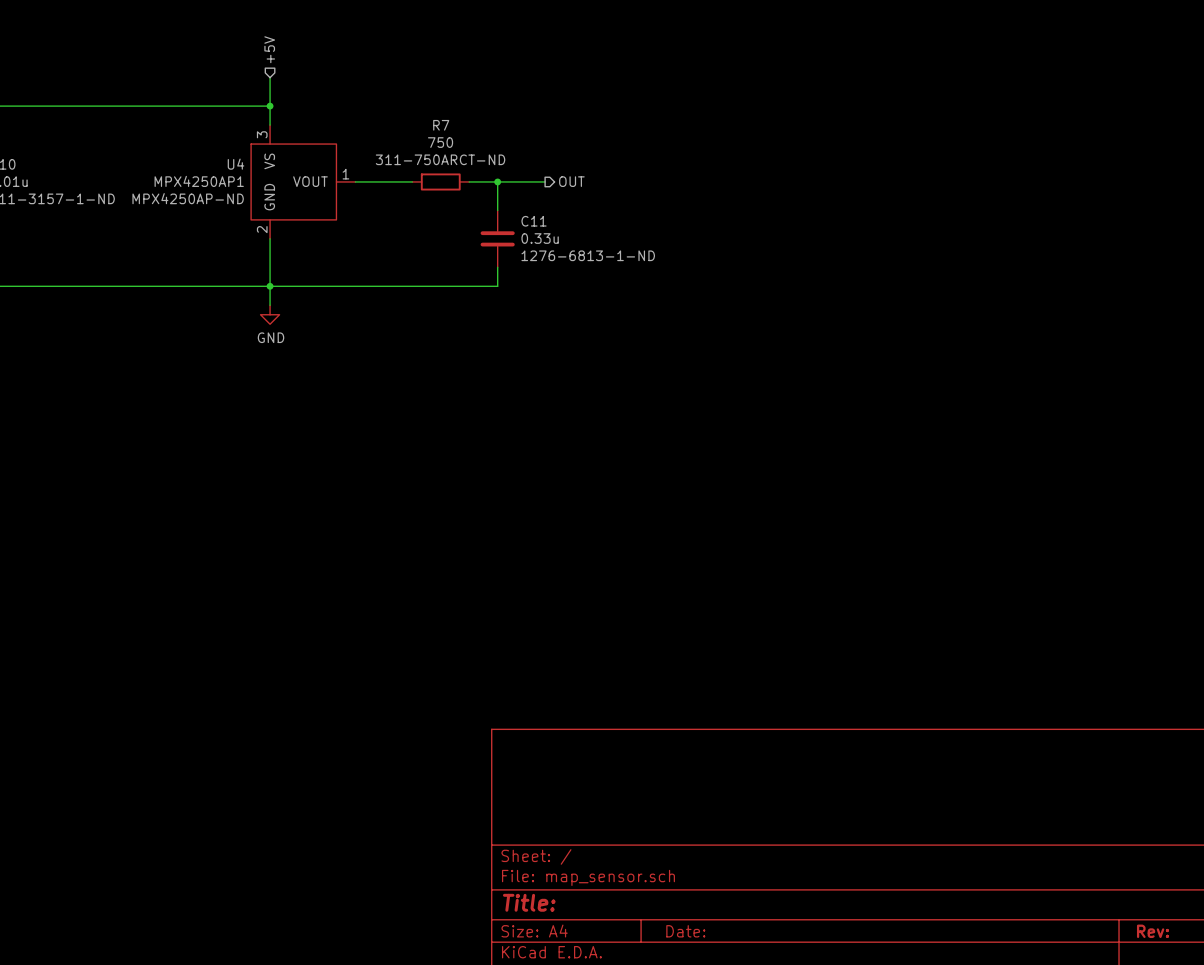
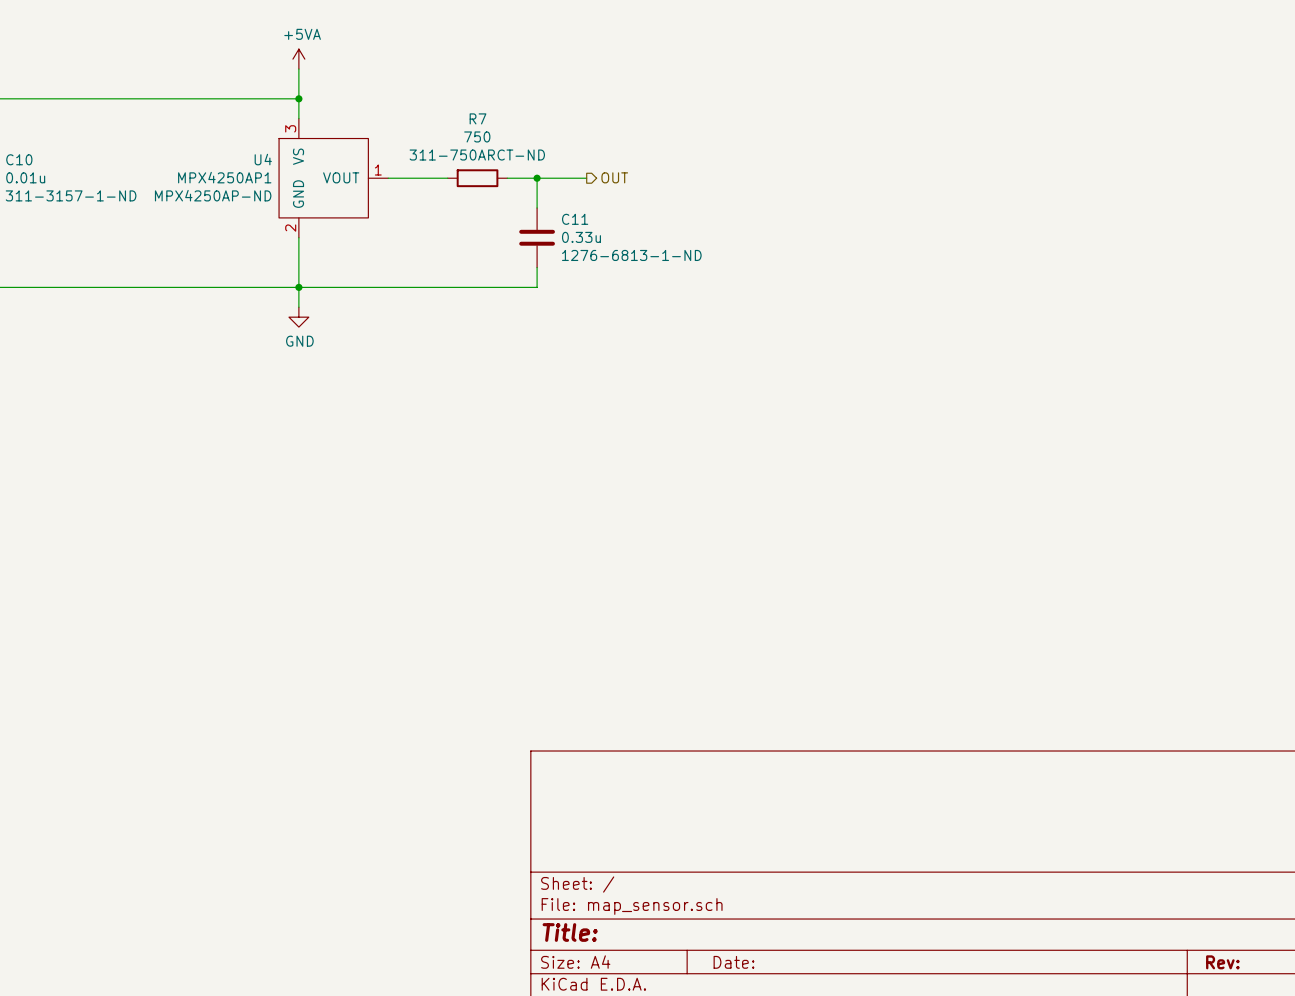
hierarchical label: +5V (269, 49) -> none
power symbol: none -> +5VA (298, 59)

